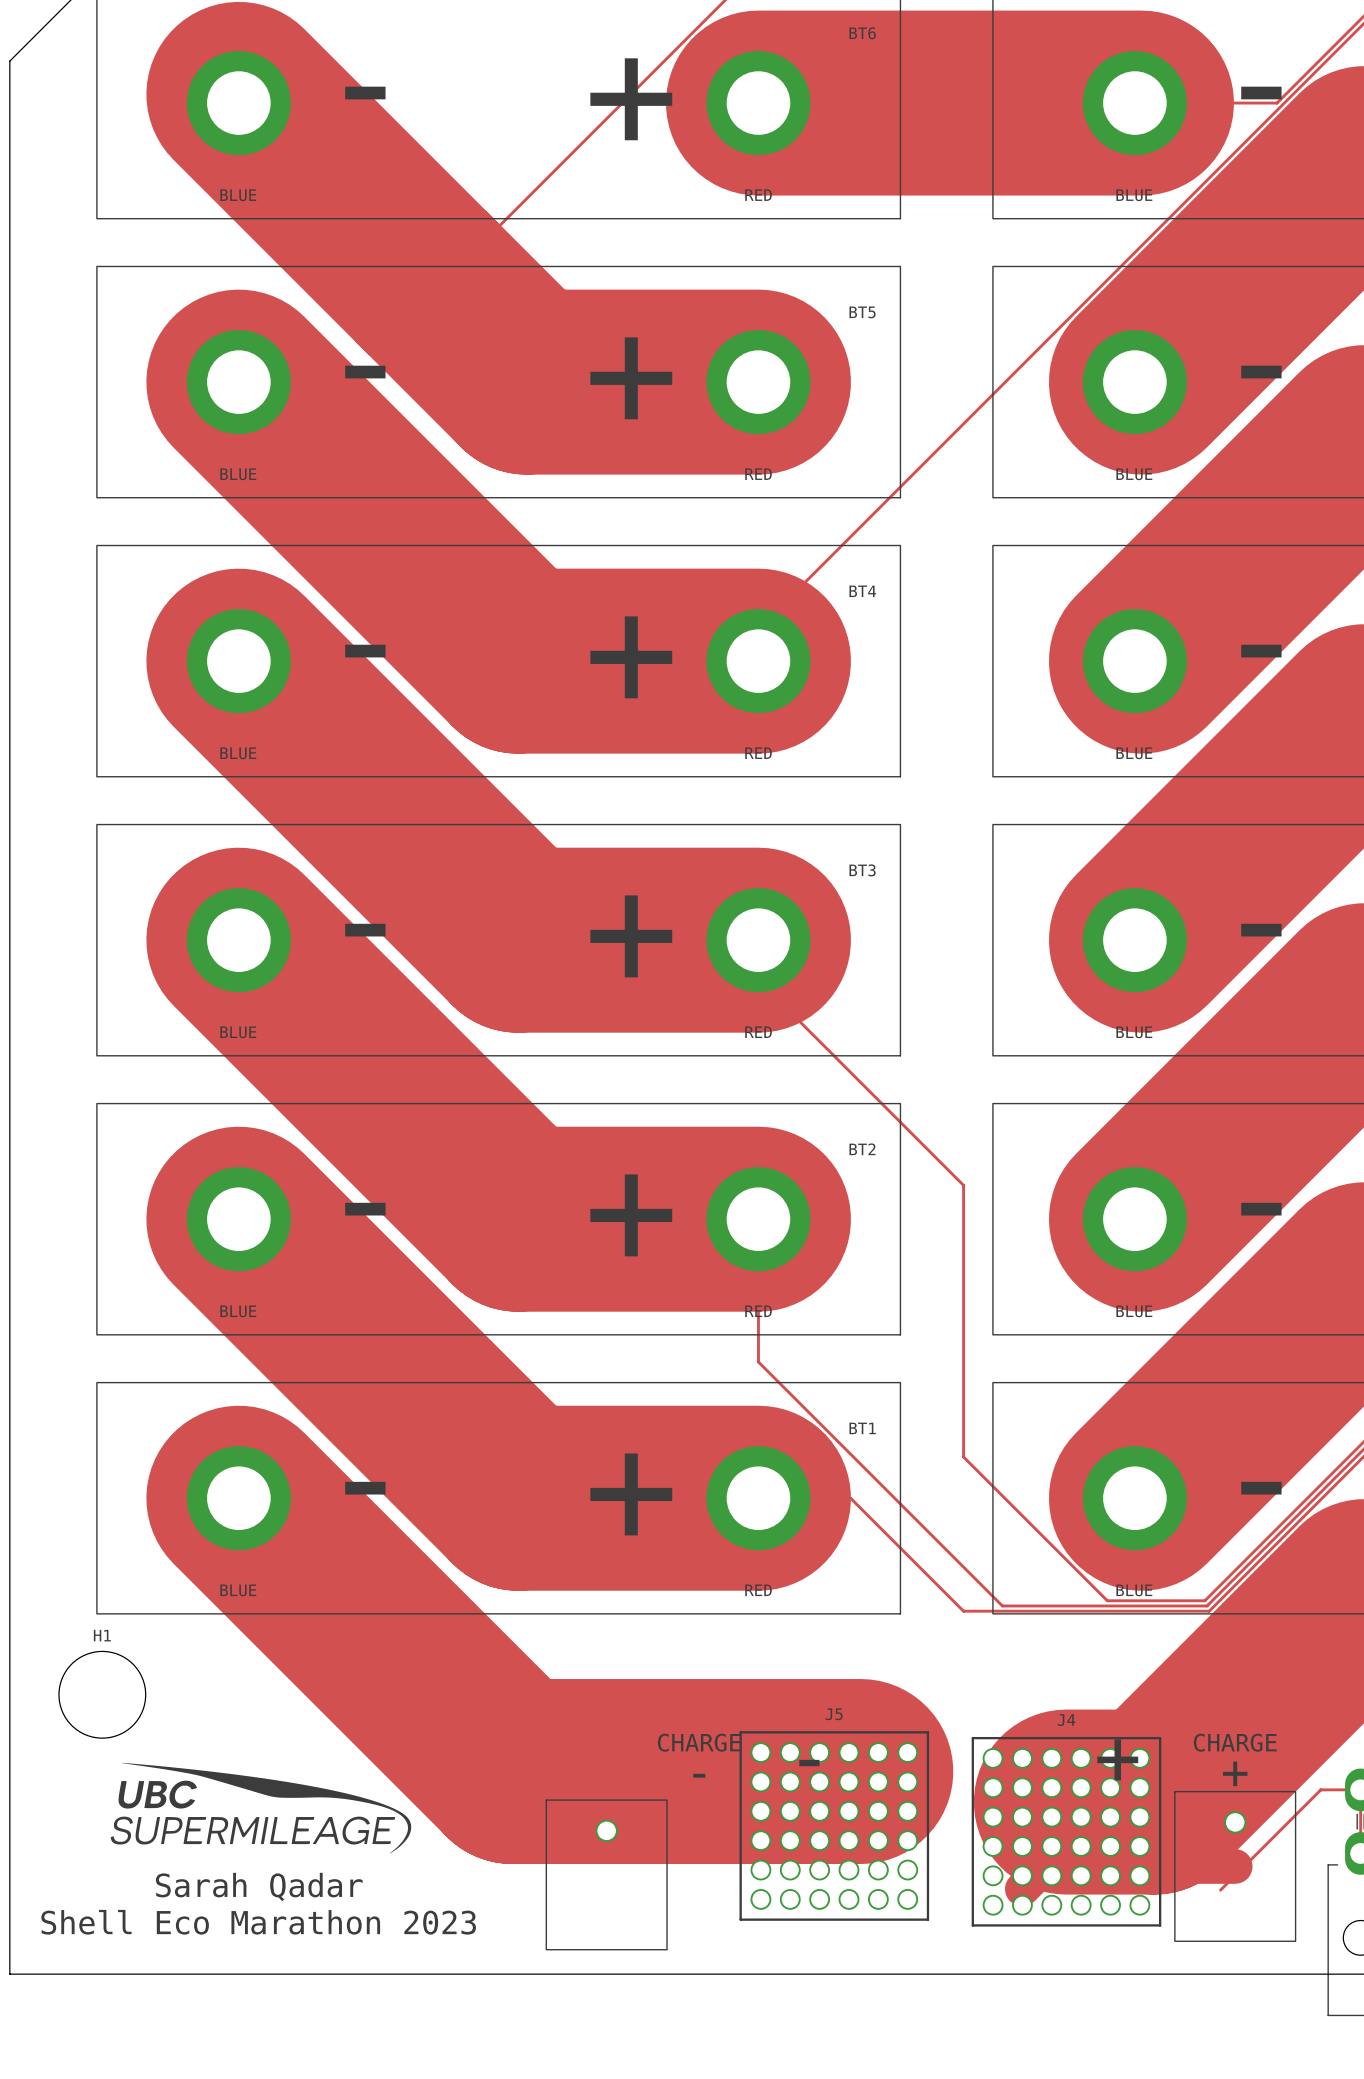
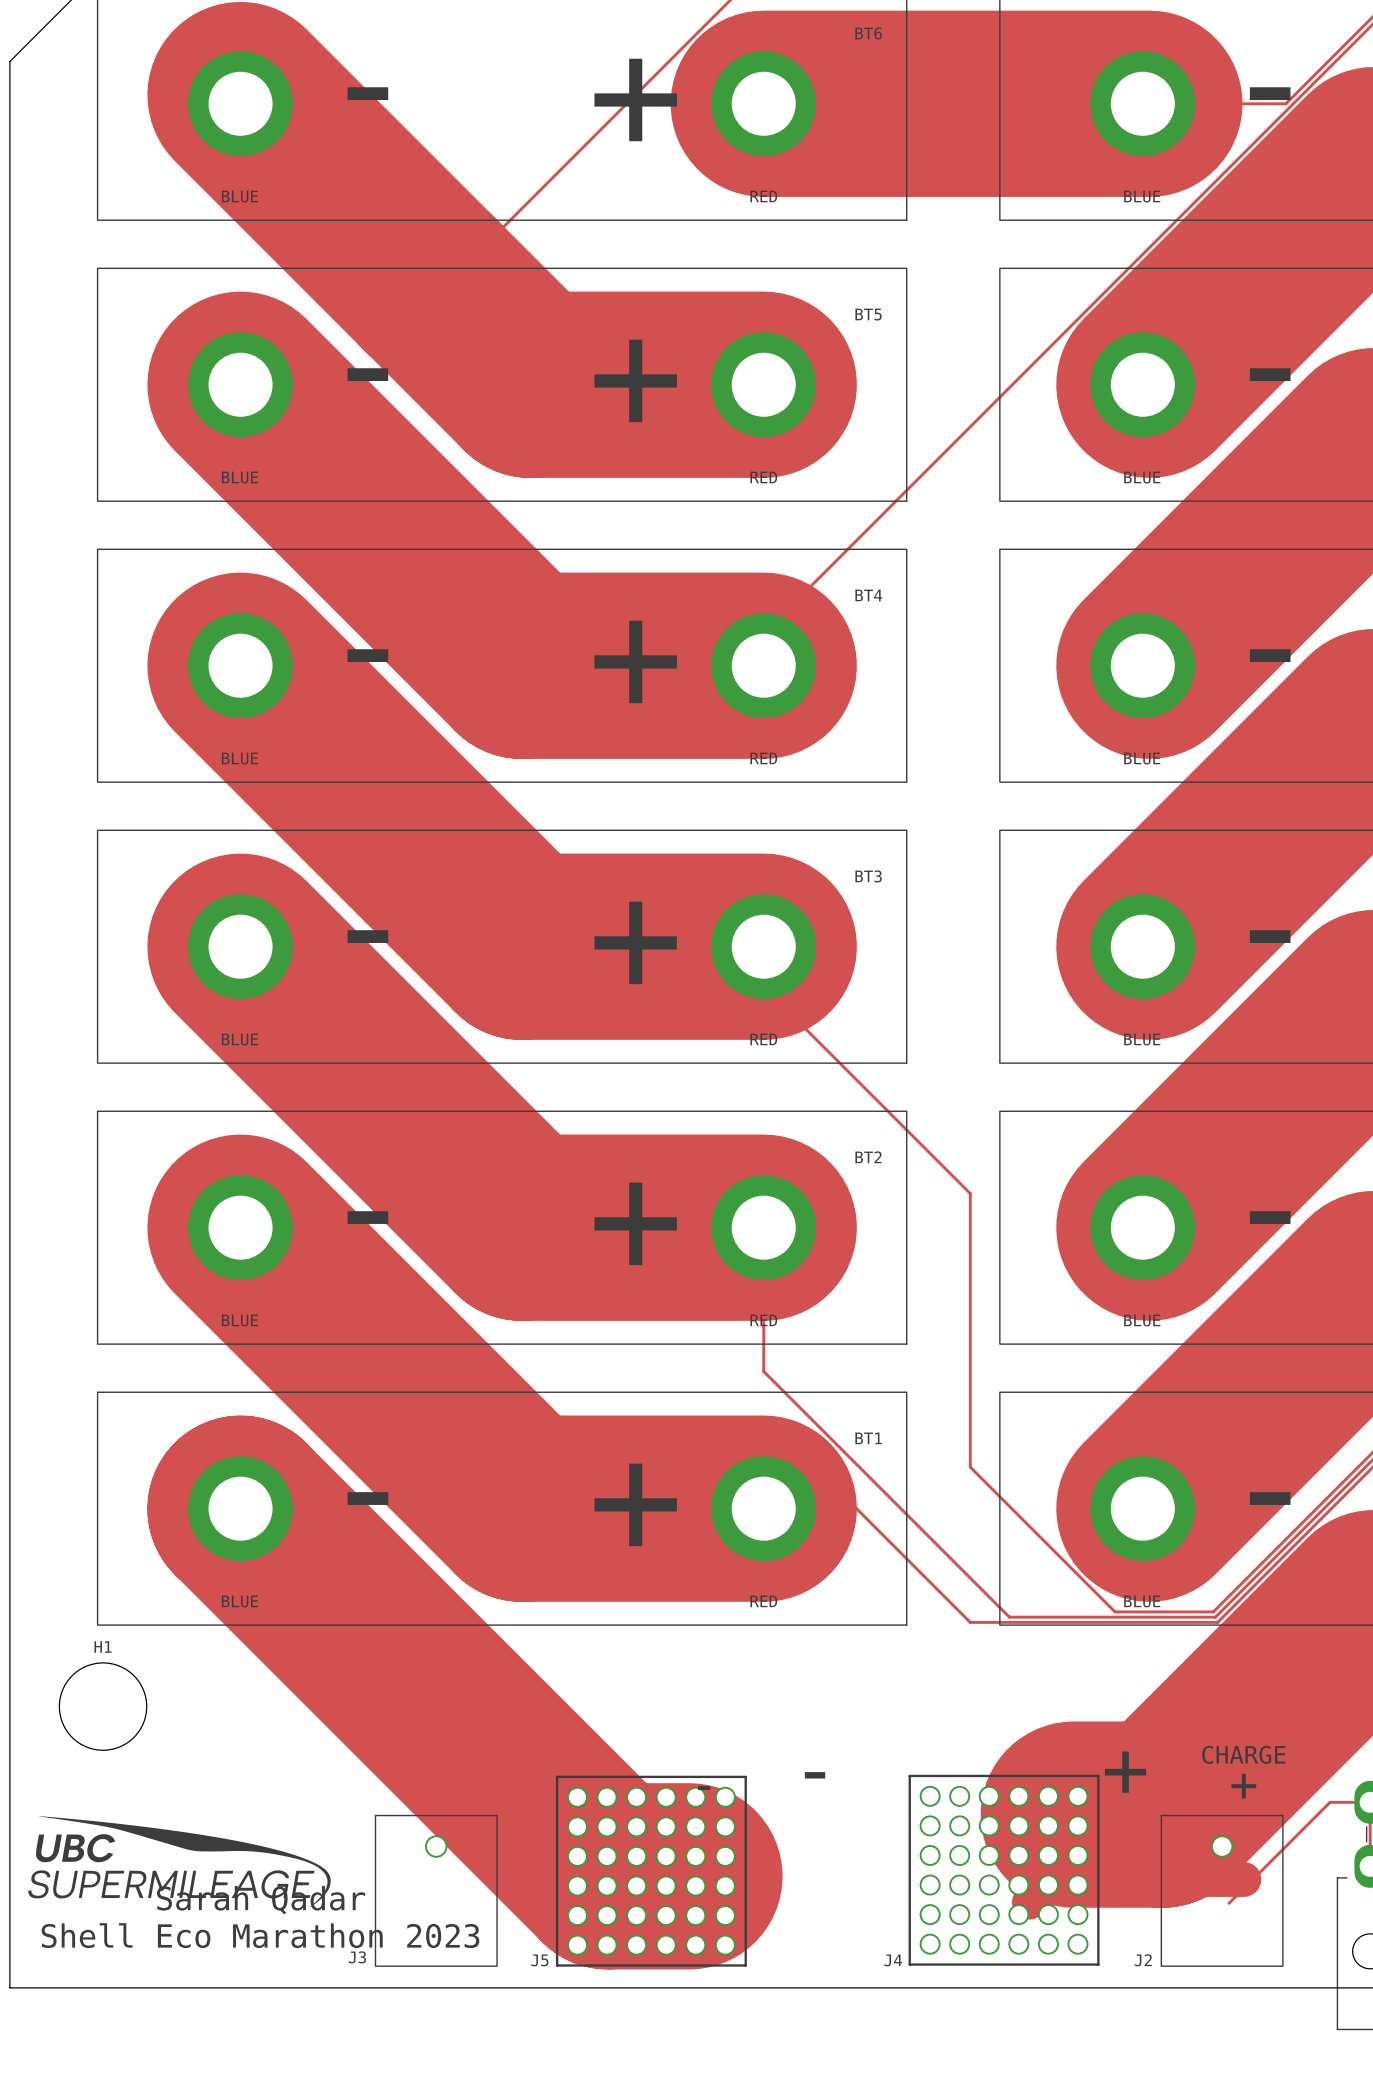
track: (238, 1498) (512, 1771) (860, 1771) -> (240, 1508) (607, 1876) (689, 1876)
J5 name position: J5 (834, 1714) -> J5 (539, 1960)
J4 name position: J4 (1066, 1720) -> J4 (893, 1960)
text: CHARGE (699, 1742) -> none
drawing position: (260, 1808) -> (179, 1861)
J5 position: (834, 1826) -> (651, 1871)
J4 position: (1066, 1831) -> (1004, 1870)
part: (1235, 1866) -> none
part: (606, 1874) -> none
J3: none -> (436, 1890)
J2: none -> (1222, 1890)

